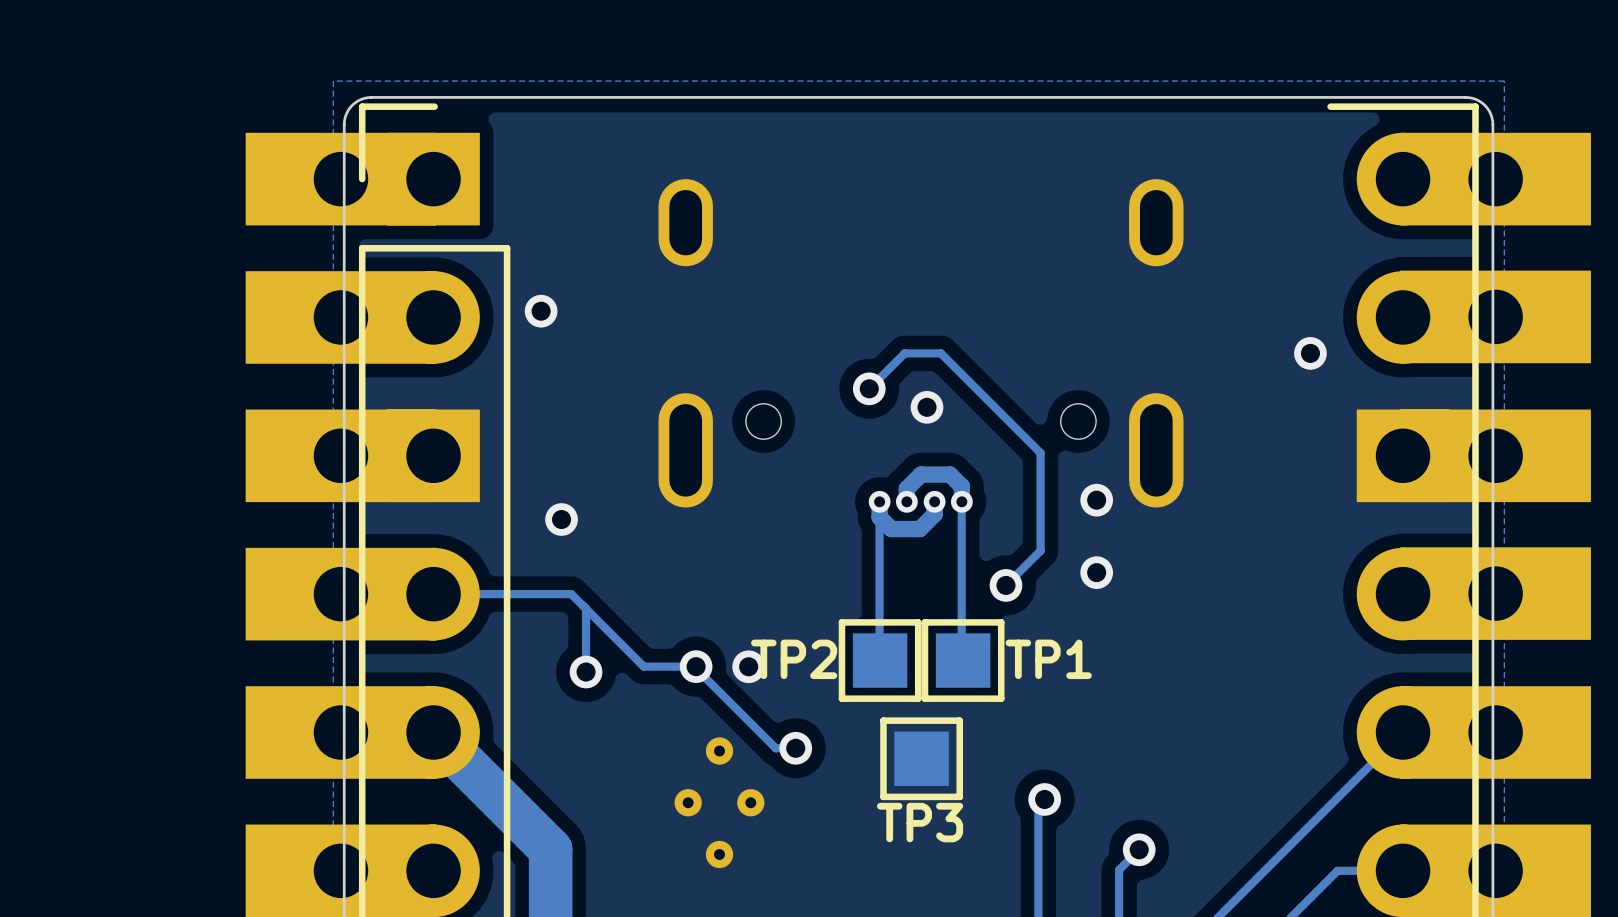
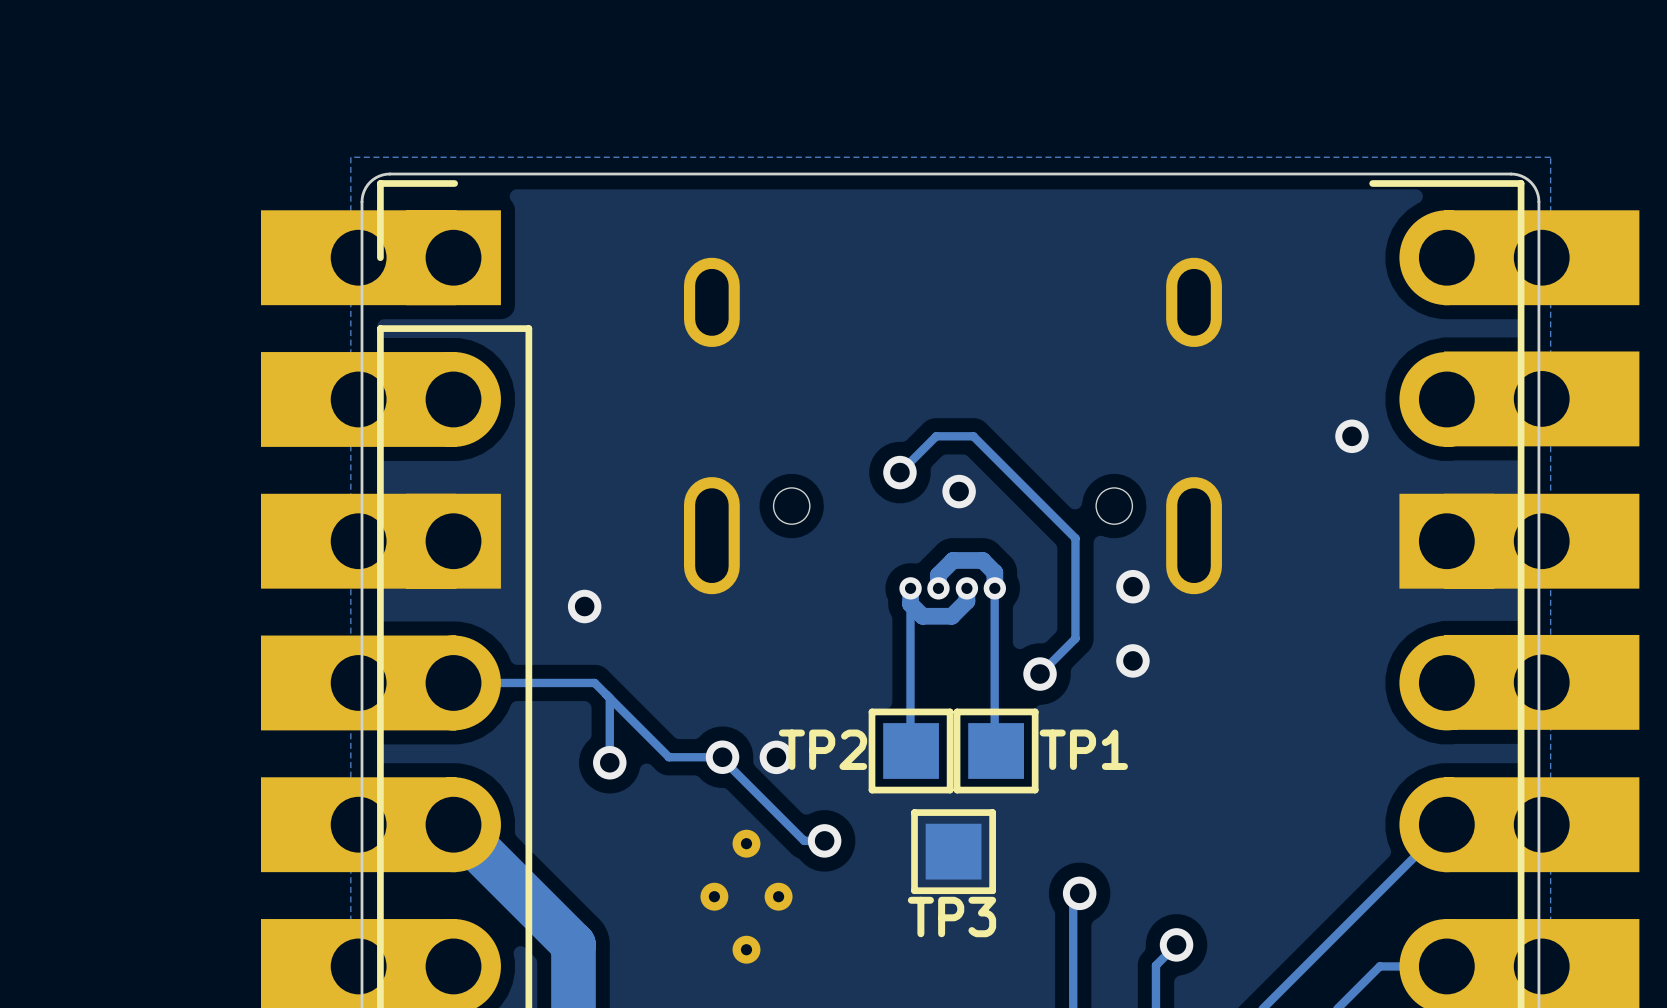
via: (541, 311) -> none

